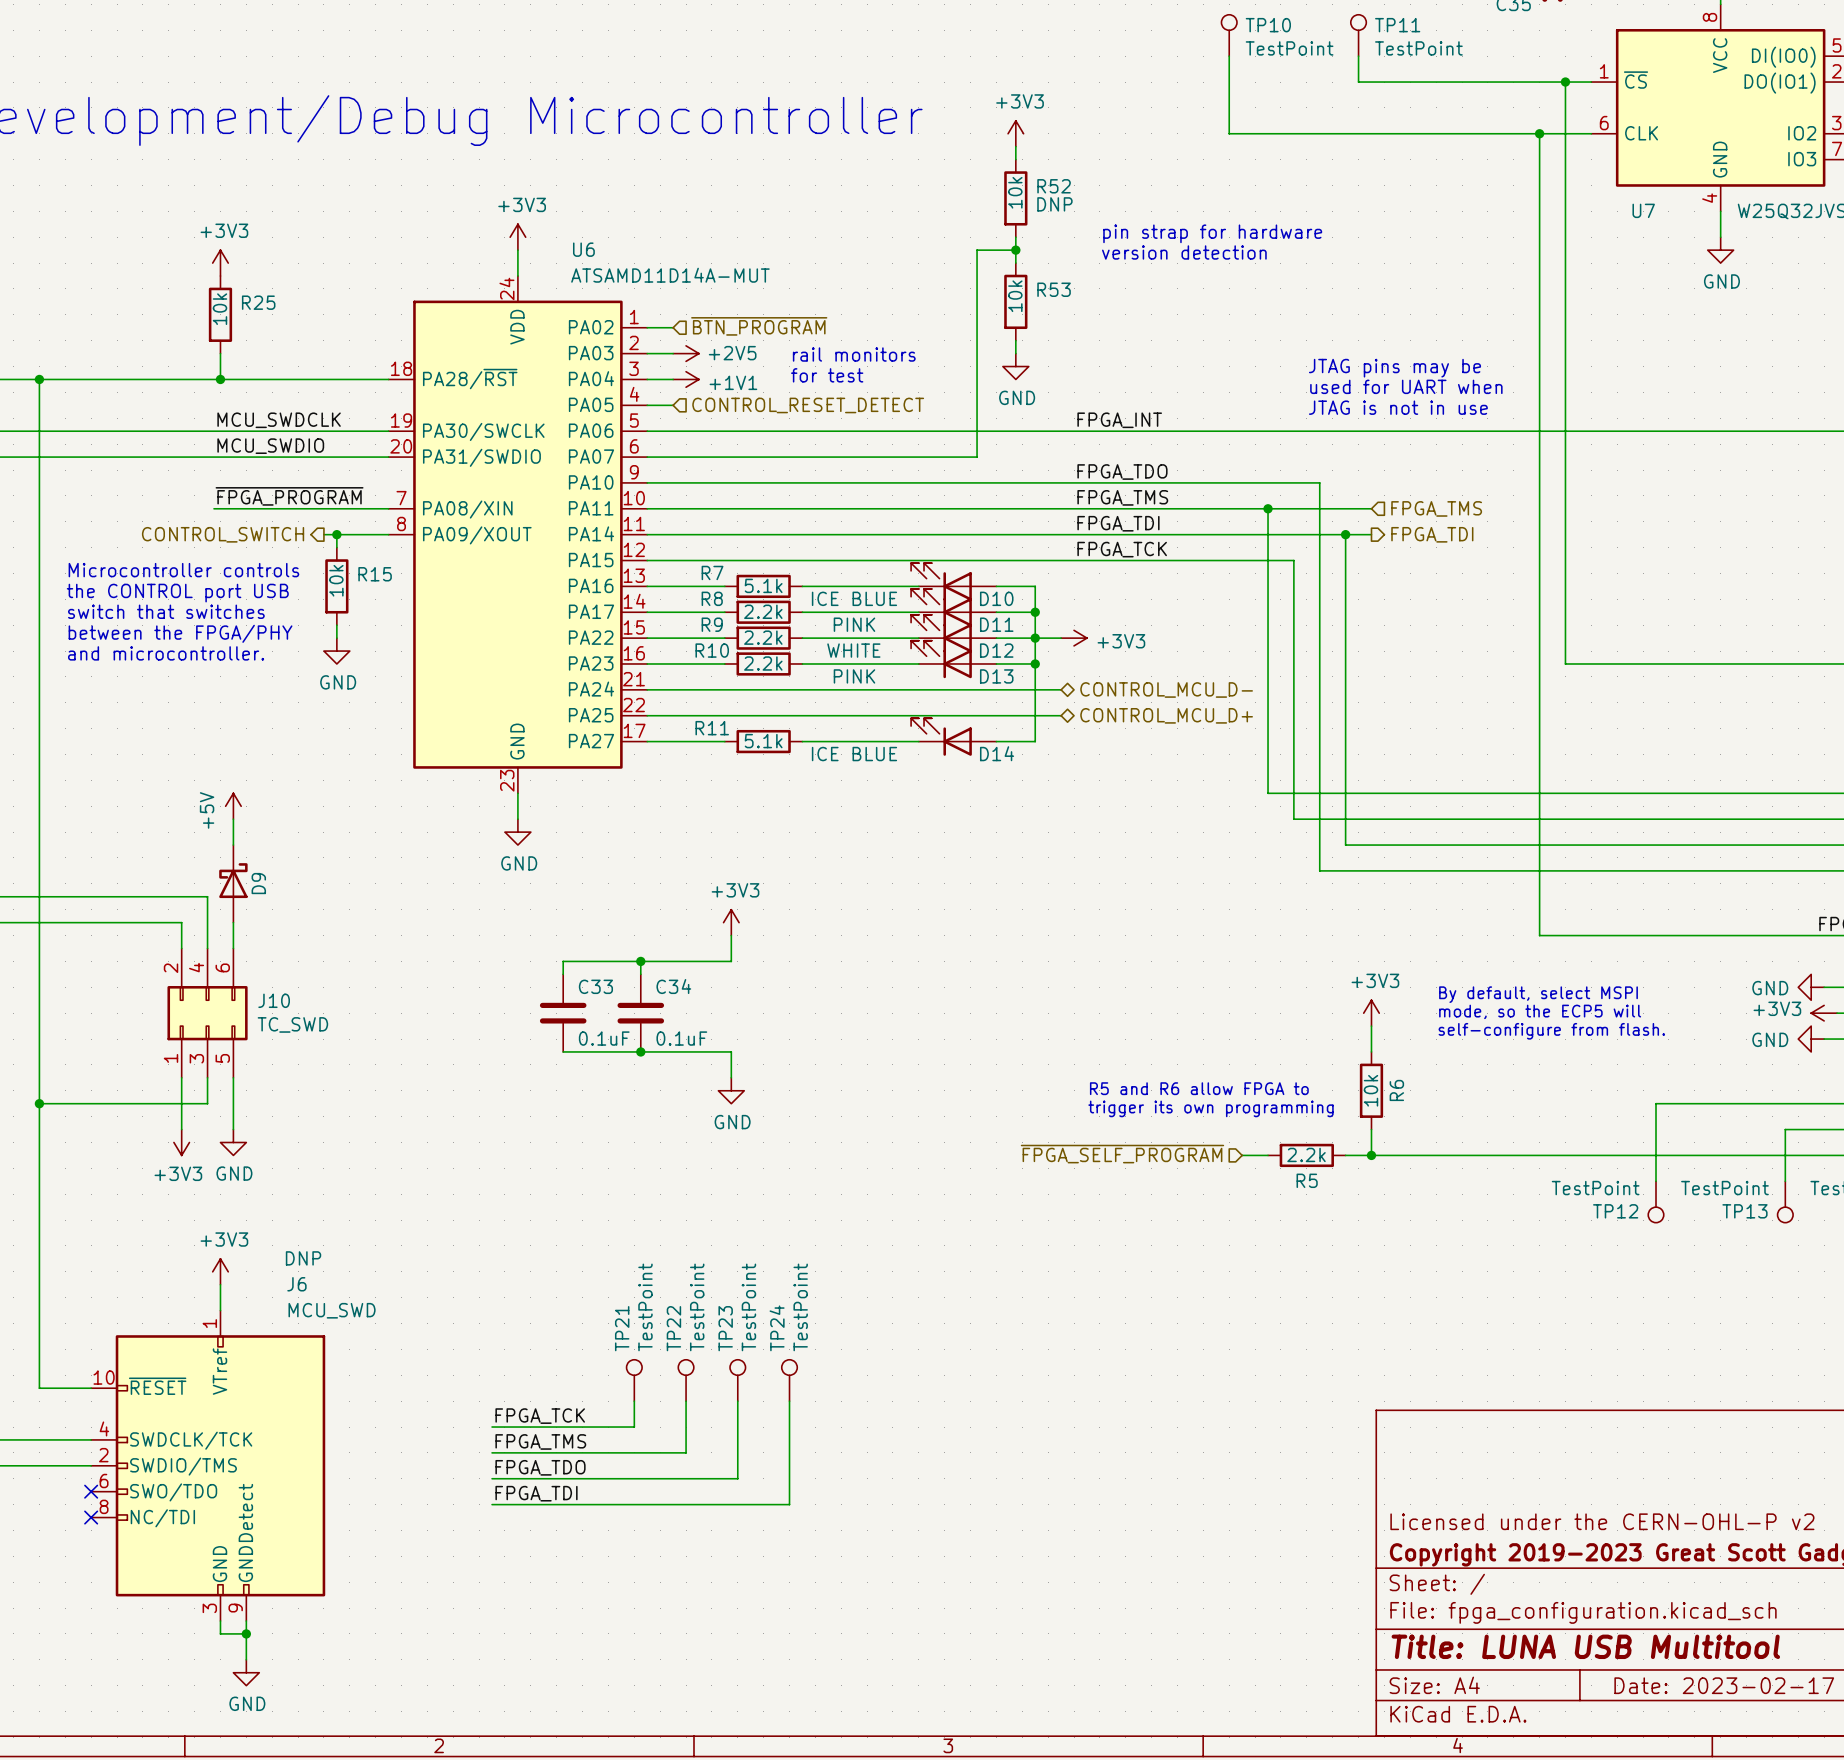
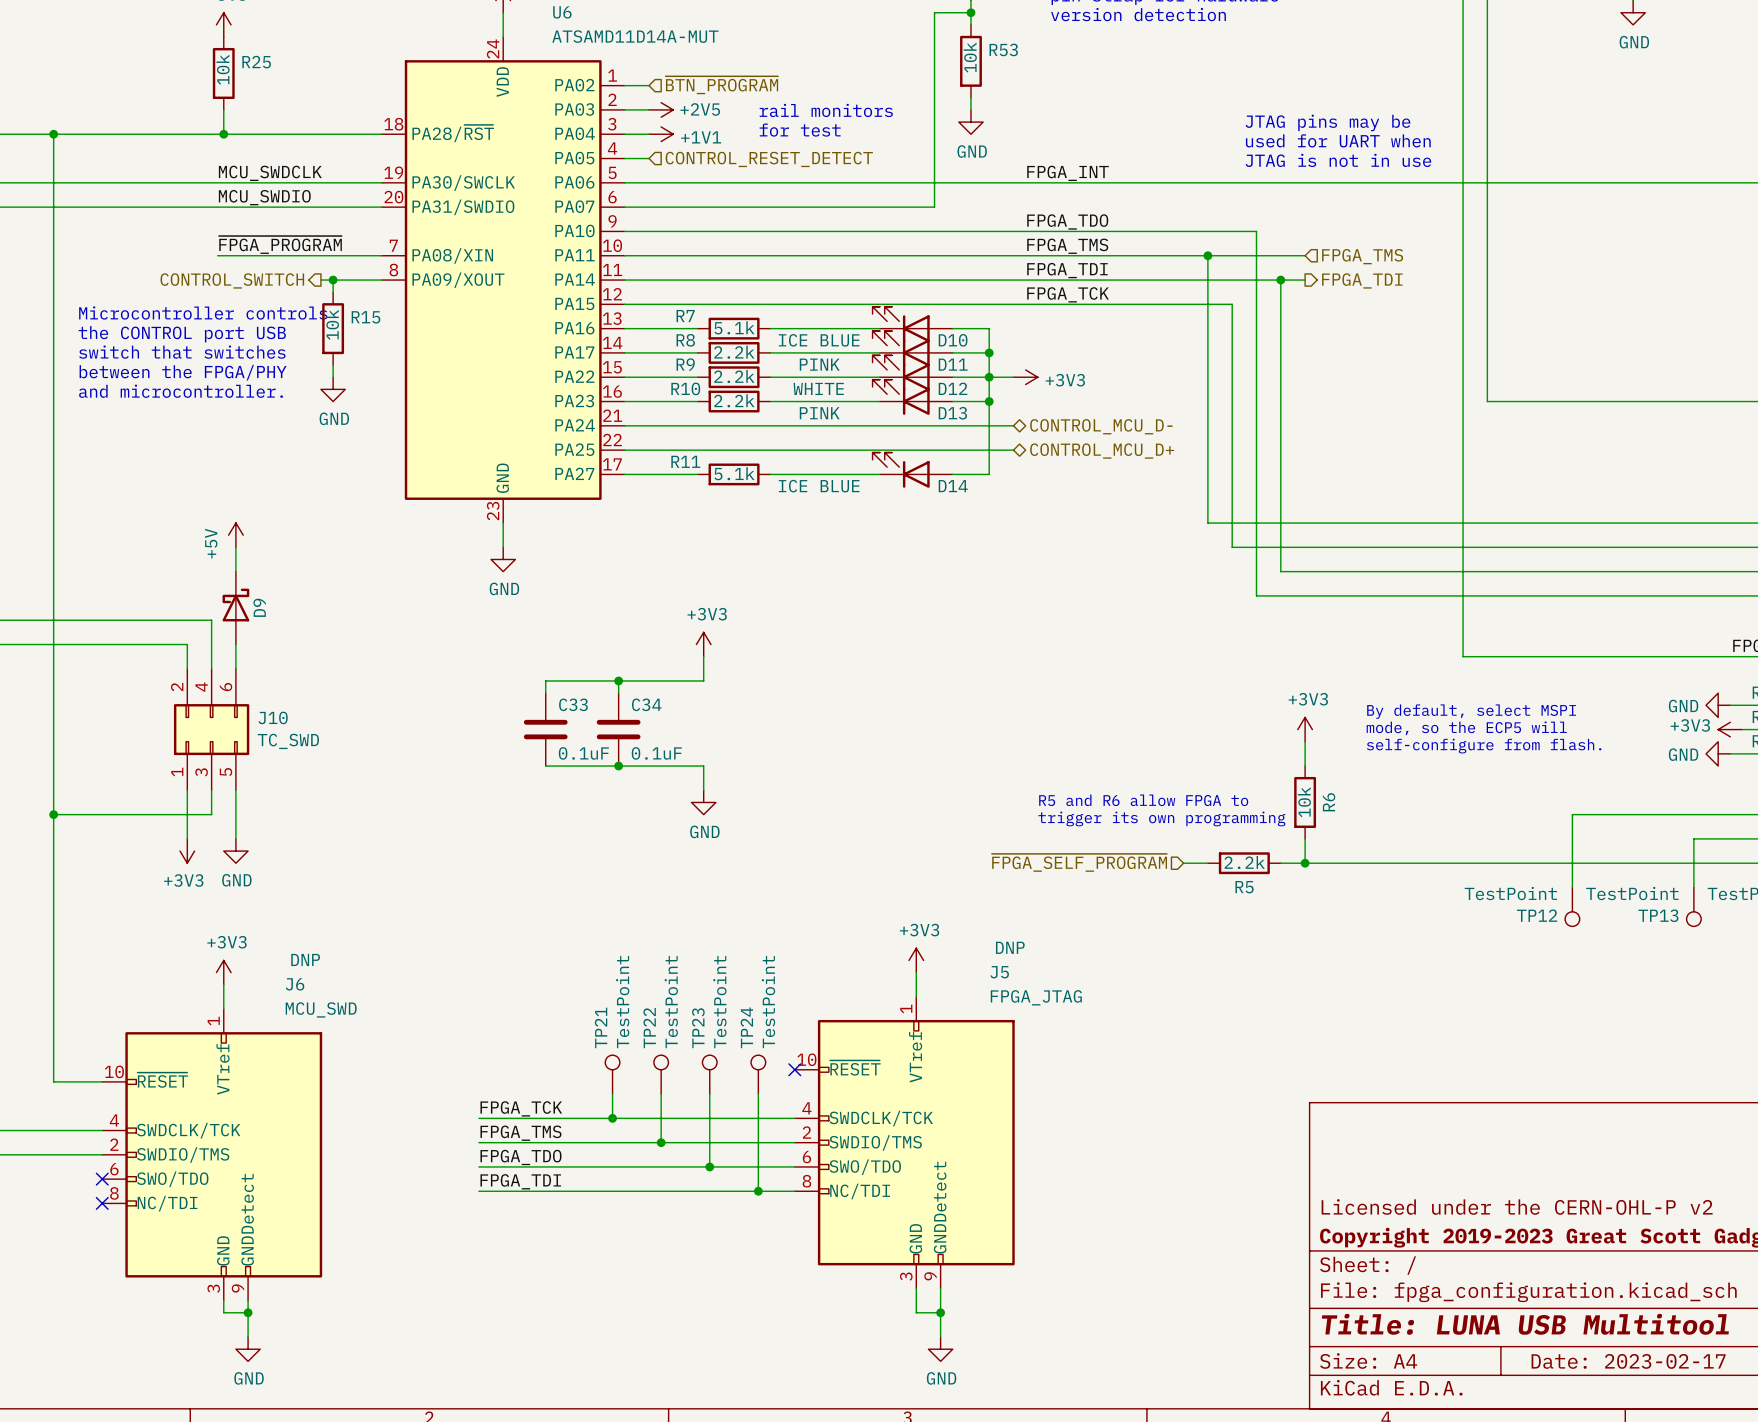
power symbol: none -> +3V3 (916, 960)
wire: none -> (916, 972) (916, 996)
no-connect mark: none -> (794, 1069)
wire: none -> (612, 1118) (794, 1118)
junction: none -> (612, 1118)
wire: none -> (661, 1142) (794, 1142)
junction: none -> (661, 1142)
J5: none -> FPGA_JTAG (904, 1142)
wire: none -> (709, 1166) (794, 1166)
junction: none -> (709, 1166)
wire: none -> (758, 1191) (794, 1191)
junction: none -> (758, 1191)
wire: none -> (916, 1288) (916, 1312) (940, 1312)
wire: none -> (940, 1288) (940, 1337)
junction: none -> (940, 1312)
power symbol: none -> GND (940, 1349)

